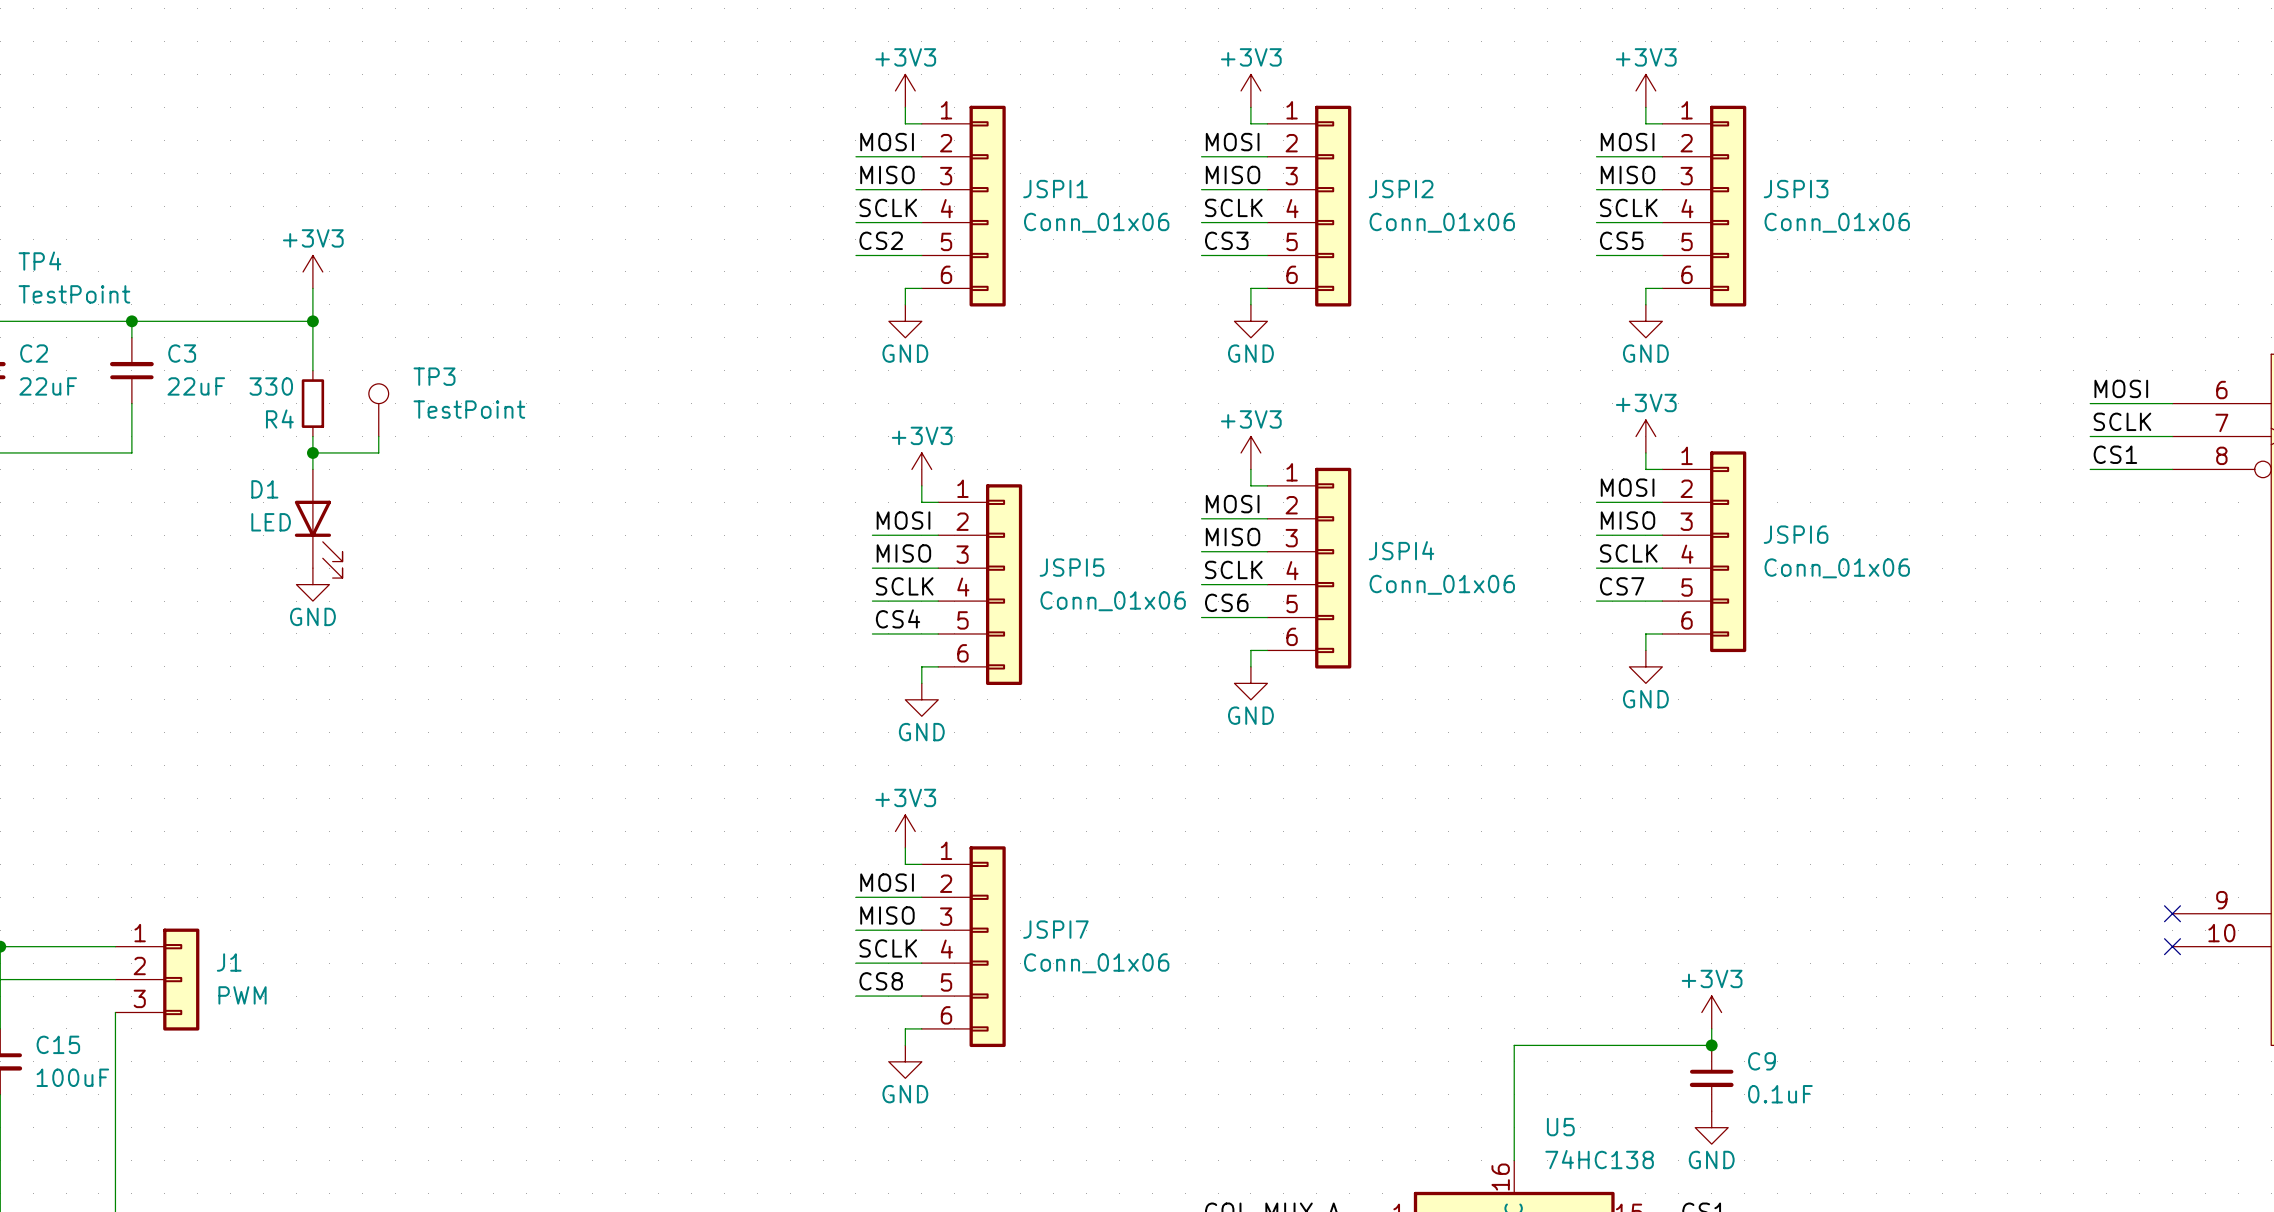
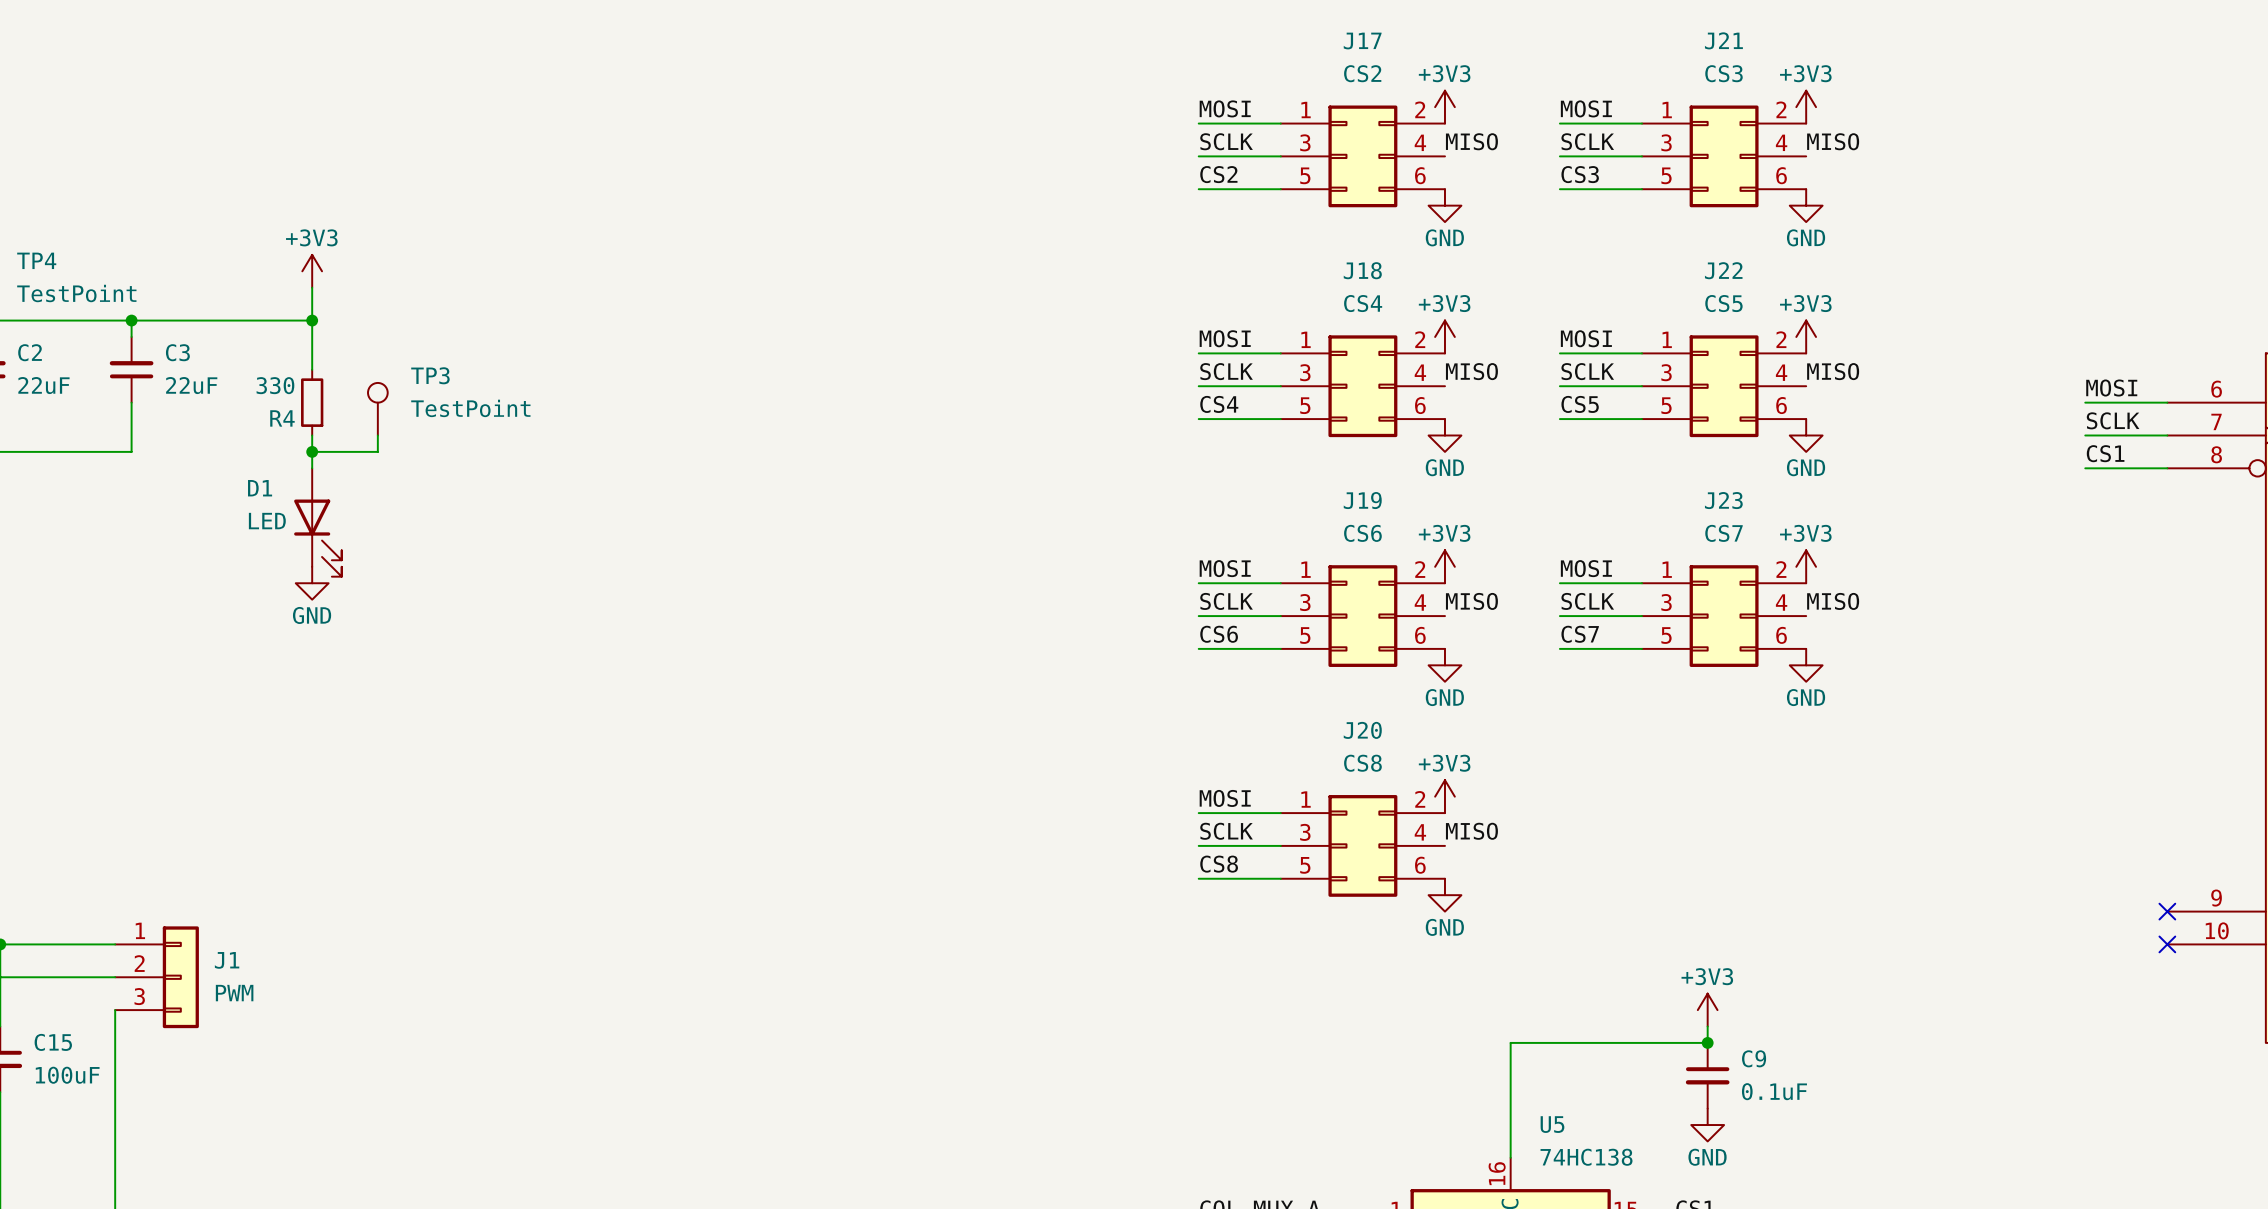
power symbol: +3V3 (905, 90) -> none
power symbol: +3V3 (1250, 90) -> none
power symbol: +3V3 (1645, 90) -> none
wire: (905, 107) (905, 123) (921, 123) -> none
wire: (1250, 107) (1250, 123) -> (1198, 123) (1247, 123)
power symbol: none -> +3V3 (1444, 107)
wire: (1645, 107) (1645, 123) (1662, 123) -> none
power symbol: none -> +3V3 (1806, 107)
label: none -> MOSI (1225, 108)
wire: none -> (1559, 123) (1642, 123)
label: MOSI (887, 142) -> none
label: MOSI (1232, 142) -> SCLK (1226, 141)
label: none -> MISO (1471, 141)
label position: MOSI (1627, 142) -> MOSI (1586, 108)
label: none -> MISO (1833, 141)
wire: (855, 156) (921, 156) -> none
J17: none -> CS2 (1362, 156)
wire: none -> (1559, 156) (1592, 156)
J21: none -> CS3 (1724, 156)
label: MISO (887, 174) -> none
label: MISO (1233, 174) -> CS2 (1218, 174)
label: none -> CS3 (1580, 174)
label: MISO (1627, 174) -> none
wire: (855, 189) (921, 189) -> none
wire: none -> (1559, 189) (1592, 189)
JSPI1: Conn_01x06 (963, 206) -> none
JSPI2: Conn_01x06 (1309, 206) -> none
power symbol: none -> GND (1444, 205)
JSPI3: Conn_01x06 (1704, 206) -> none
power symbol: none -> GND (1806, 205)
label: SCLK (888, 207) -> none
label position: SCLK (1233, 207) -> SCLK (1226, 371)
label position: SCLK (1628, 207) -> SCLK (1587, 141)
wire: (855, 222) (921, 222) -> none
wire: (1201, 222) (1267, 222) -> none
wire: (1596, 222) (1662, 222) -> none
label: CS2 (881, 240) -> none
label: CS3 (1226, 240) -> none
label position: CS5 (1621, 240) -> CS5 (1580, 404)
wire: (855, 255) (921, 255) -> none
wire: (1201, 255) (1267, 255) -> none
wire: (1596, 255) (1662, 255) -> none
wire: (921, 288) (905, 288) (905, 304) -> none
wire: (1267, 288) (1250, 288) (1250, 304) -> none
wire: (1662, 288) (1645, 288) (1645, 304) -> none
power symbol: GND (905, 321) -> none
power symbol: GND (1250, 321) -> none
power symbol: GND (1645, 321) -> none
power symbol: none -> +3V3 (1444, 336)
power symbol: none -> +3V3 (1806, 336)
label: none -> MOSI (1225, 338)
label: none -> MOSI (1586, 338)
wire: none -> (1198, 353) (1280, 353)
wire: none -> (1559, 353) (1642, 353)
label: none -> MISO (1471, 371)
label: none -> SCLK (1587, 371)
label: none -> MISO (1833, 371)
wire: none -> (1198, 386) (1280, 386)
J18: none -> CS4 (1362, 386)
wire: none -> (1559, 386) (1642, 386)
J22: none -> CS5 (1724, 386)
label: none -> CS4 (1219, 404)
wire: none -> (1198, 419) (1280, 419)
wire: none -> (1559, 419) (1642, 419)
power symbol: none -> GND (1444, 435)
power symbol: +3V3 (1645, 436) -> none
power symbol: none -> GND (1806, 435)
power symbol: +3V3 (1250, 452) -> none
wire: (1645, 452) (1645, 469) (1662, 469) -> none
power symbol: +3V3 (921, 469) -> none
wire: (1250, 469) (1250, 485) (1267, 485) -> none
wire: (921, 485) (921, 502) (938, 502) -> none
label: MOSI (1627, 487) -> none
wire: (1596, 502) (1662, 502) -> none
label: MOSI (1232, 504) -> none
wire: (1201, 518) (1267, 518) -> none
label: MOSI (903, 520) -> none
label: MISO (1627, 520) -> none
wire: (872, 535) (938, 535) -> none
wire: (1596, 535) (1662, 535) -> none
label: MISO (1233, 537) -> none
wire: (1201, 551) (1267, 551) -> none
JSPI6: Conn_01x06 (1704, 551) -> none
label: MISO (903, 553) -> none
label position: SCLK (1628, 553) -> SCLK (1587, 601)
wire: (872, 568) (938, 568) -> none
JSPI4: Conn_01x06 (1309, 568) -> none
power symbol: none -> +3V3 (1444, 566)
wire: (1596, 568) (1662, 568) -> none
power symbol: none -> +3V3 (1806, 566)
label: SCLK (1233, 569) -> MOSI (1225, 568)
label: none -> MOSI (1586, 568)
JSPI5: Conn_01x06 (980, 584) -> none
wire: none -> (1559, 583) (1642, 583)
label: SCLK (904, 586) -> none
label position: CS7 (1622, 586) -> CS7 (1580, 634)
wire: (872, 601) (938, 601) -> none
wire: (1596, 601) (1662, 601) -> none
label: CS6 (1226, 602) -> SCLK (1226, 601)
label: none -> MISO (1471, 601)
label: none -> MISO (1833, 601)
J19: none -> CS6 (1362, 616)
wire: none -> (1559, 616) (1642, 616)
J23: none -> CS7 (1724, 616)
label: CS4 (898, 618) -> none
wire: (872, 633) (938, 633) -> none
wire: (1662, 633) (1645, 633) (1645, 650) -> (1559, 648) (1642, 648)
label: none -> CS6 (1219, 634)
wire: (1250, 650) (1250, 666) -> (1247, 648) (1198, 648)
wire: (938, 666) (921, 666) (921, 683) -> none
power symbol: none -> GND (1444, 665)
power symbol: GND (1645, 666) -> none
power symbol: none -> GND (1806, 665)
power symbol: GND (1250, 683) -> none
power symbol: GND (921, 699) -> none
power symbol: none -> +3V3 (1444, 796)
label: none -> MOSI (1225, 798)
wire: none -> (1198, 813) (1280, 813)
power symbol: +3V3 (905, 831) -> none
label: none -> SCLK (1226, 831)
label: none -> MISO (1471, 831)
wire: (905, 847) (905, 864) (921, 864) -> none
wire: none -> (1198, 845) (1280, 845)
J20: none -> CS8 (1362, 845)
label: none -> CS8 (1219, 864)
wire: none -> (1198, 878) (1280, 878)
label: MOSI (887, 882) -> none
wire: (855, 897) (921, 897) -> none
power symbol: none -> GND (1444, 895)
label: MISO (887, 915) -> none
wire: (855, 930) (921, 930) -> none
JSPI7: Conn_01x06 (963, 946) -> none
label: SCLK (888, 948) -> none
wire: (855, 963) (921, 963) -> none
label: CS8 (881, 981) -> none
wire: (855, 996) (921, 996) -> none
wire: (921, 1028) (905, 1028) (905, 1045) -> none
power symbol: GND (905, 1061) -> none

